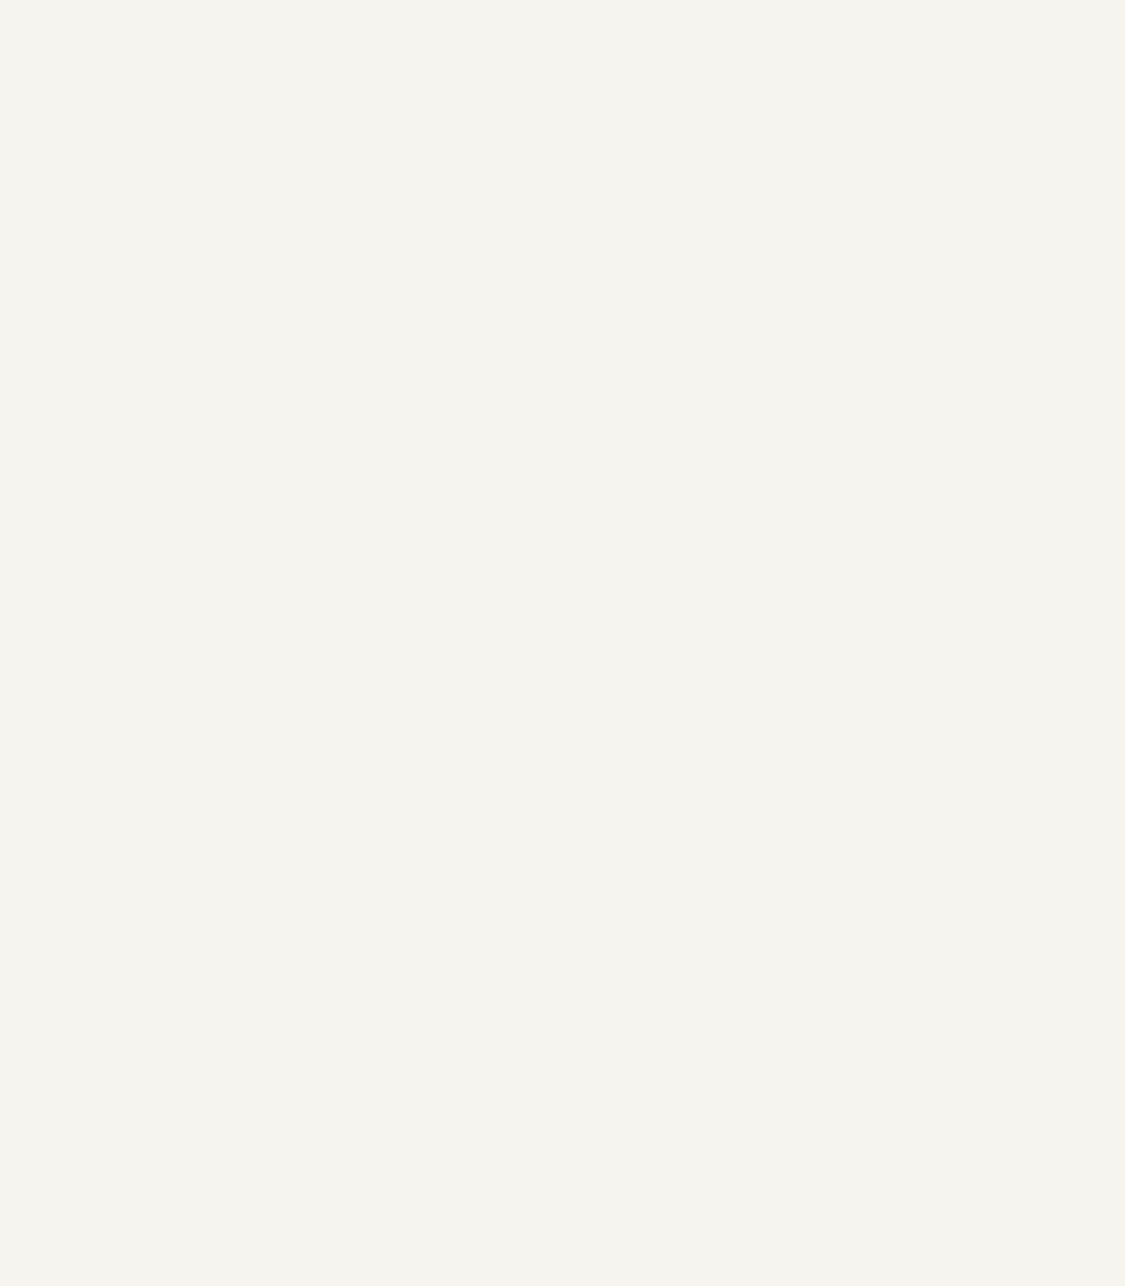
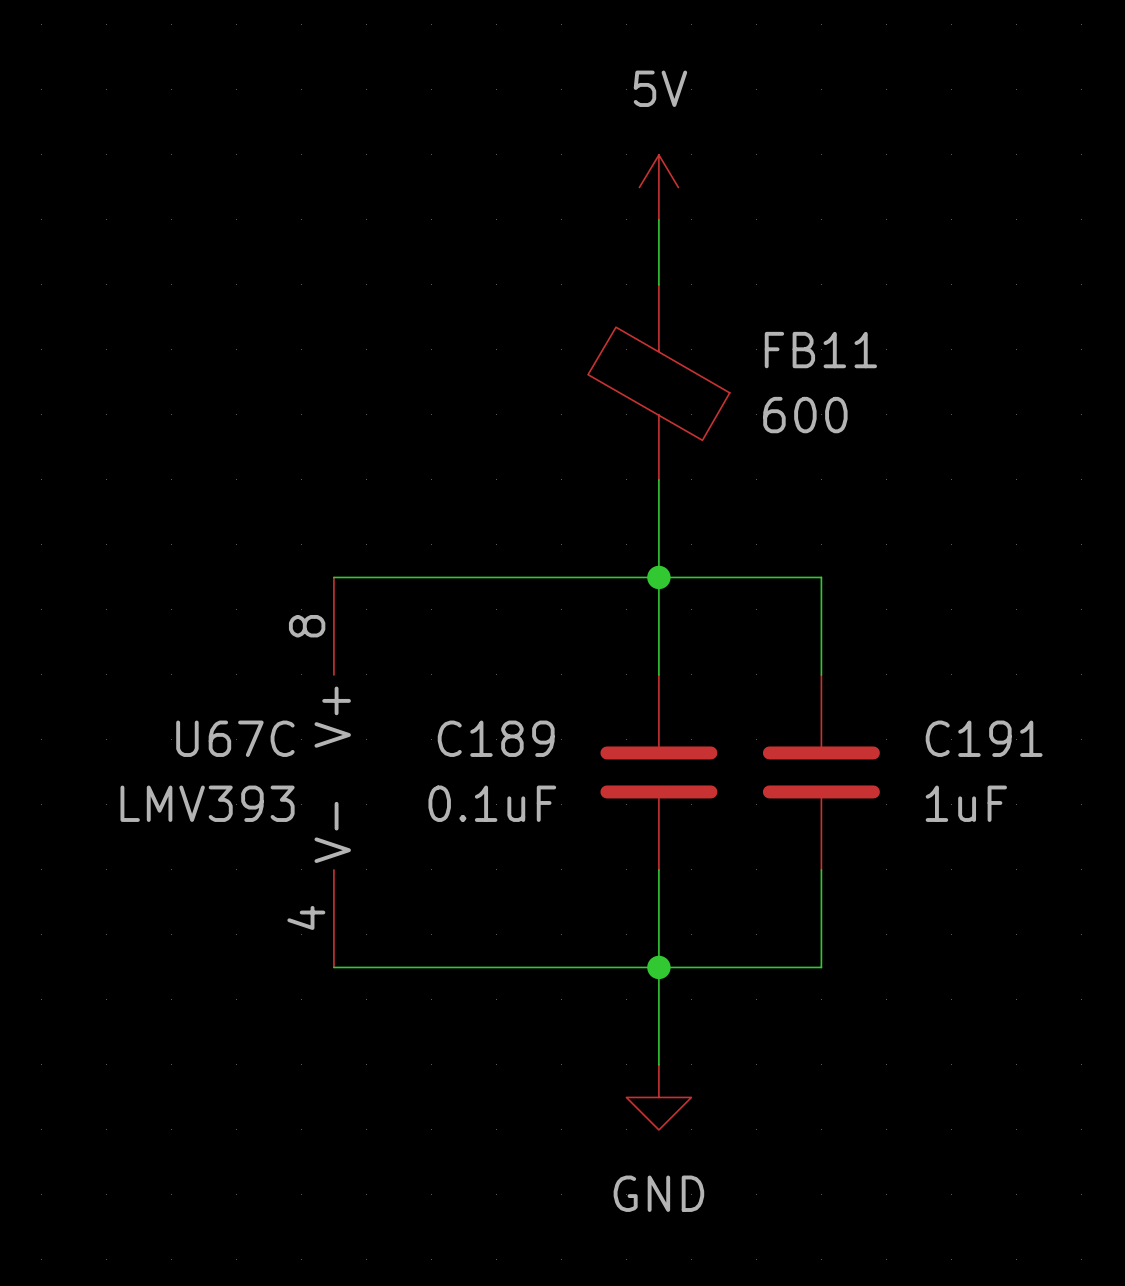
power symbol: none -> 5V (658, 187)
wire: none -> (658, 219) (658, 284)
FB11: none -> 600 (658, 382)
wire: none -> (658, 479) (658, 674)
wire: none -> (333, 577) (821, 577) (821, 674)
junction: none -> (658, 577)
U67C: none -> LMV393 (333, 772)
C189: none -> 0.1uF (658, 772)
C191: none -> 1uF (821, 772)
wire: none -> (658, 869) (658, 1064)
wire: none -> (821, 869) (821, 967) (333, 967)
junction: none -> (658, 967)
power symbol: none -> GND (658, 1097)

